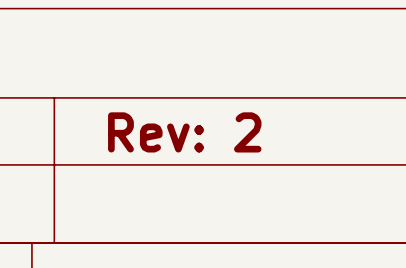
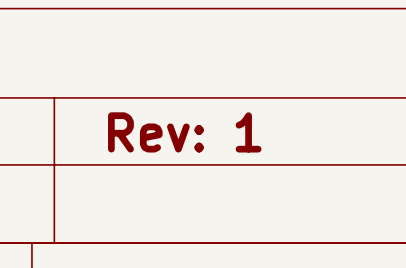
title block: Rev: 2 (184, 132) -> Rev: 1 (184, 132)

